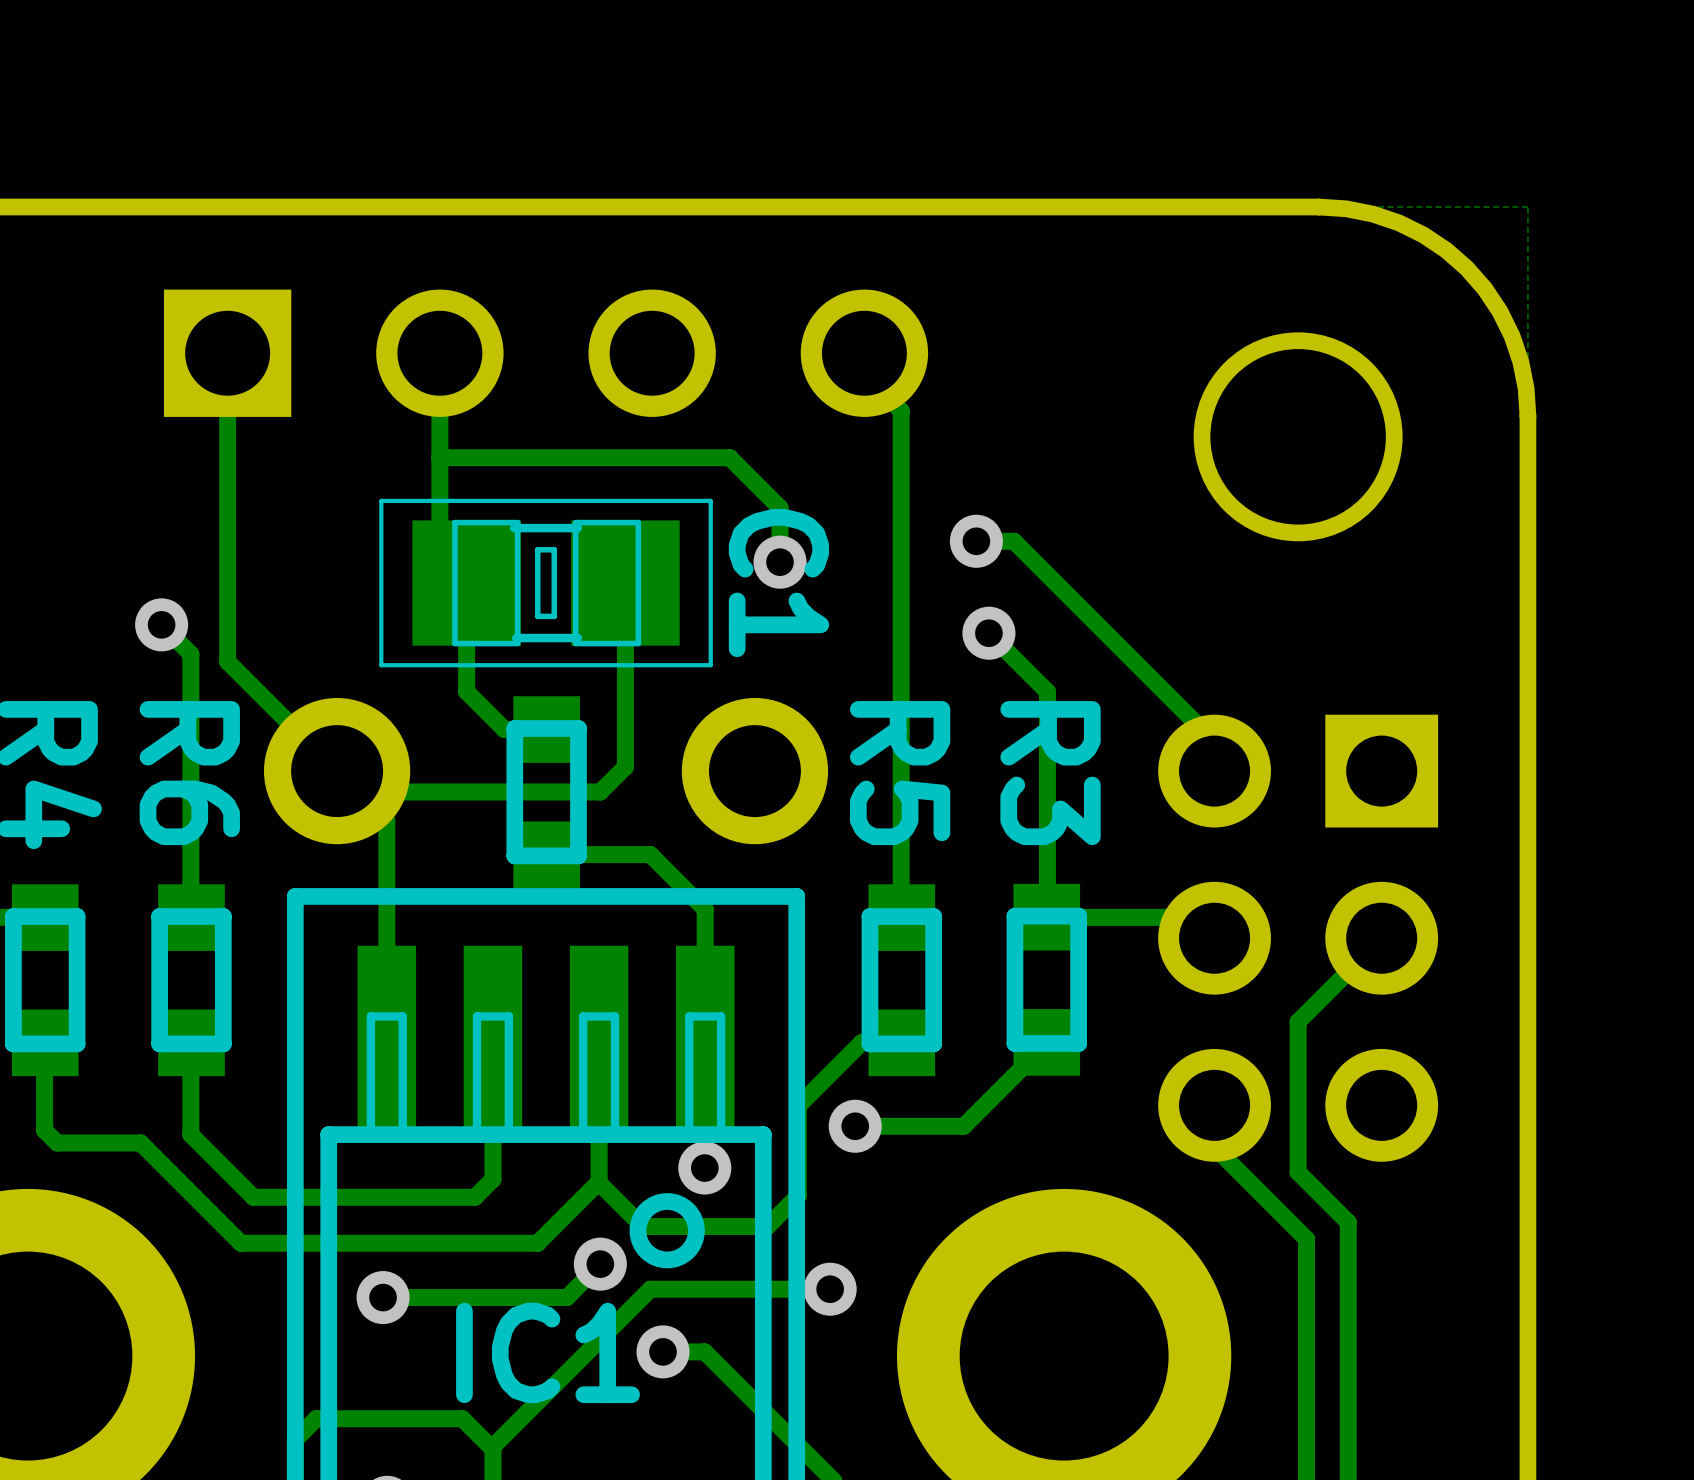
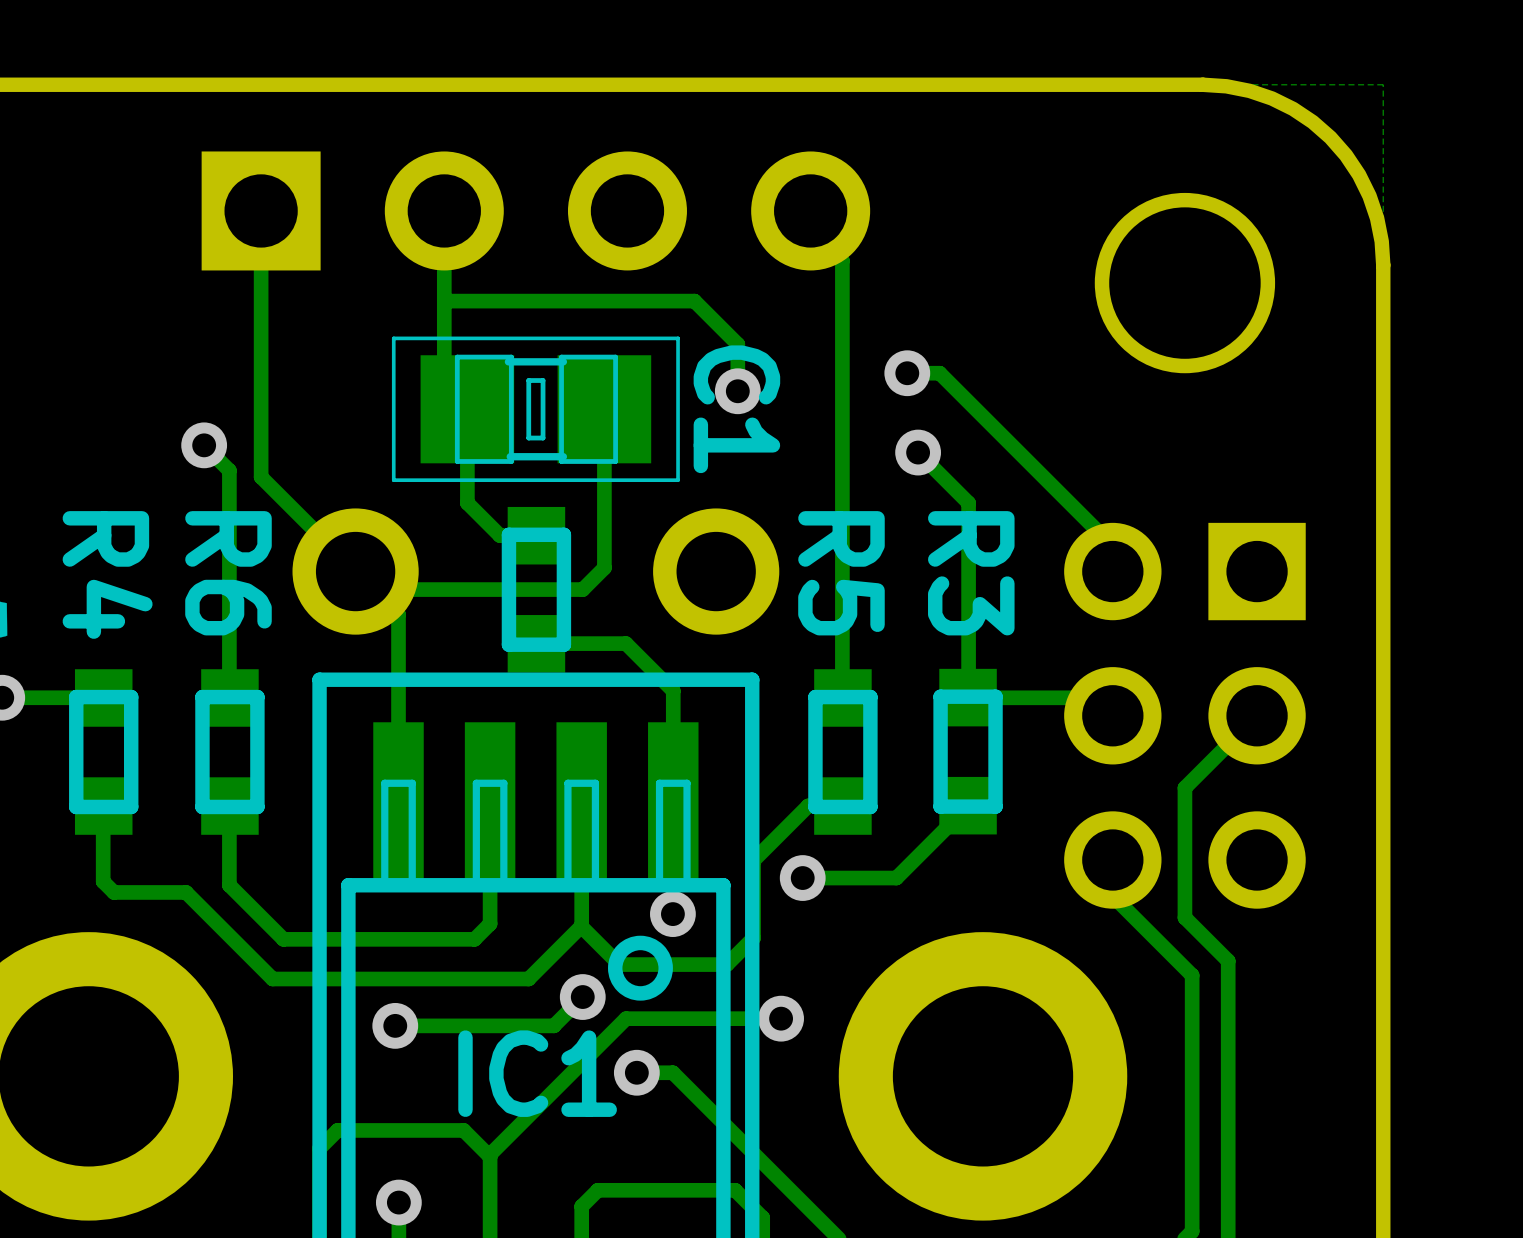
part footprint: [163, 289, 929, 417] -> [201, 151, 871, 271]

